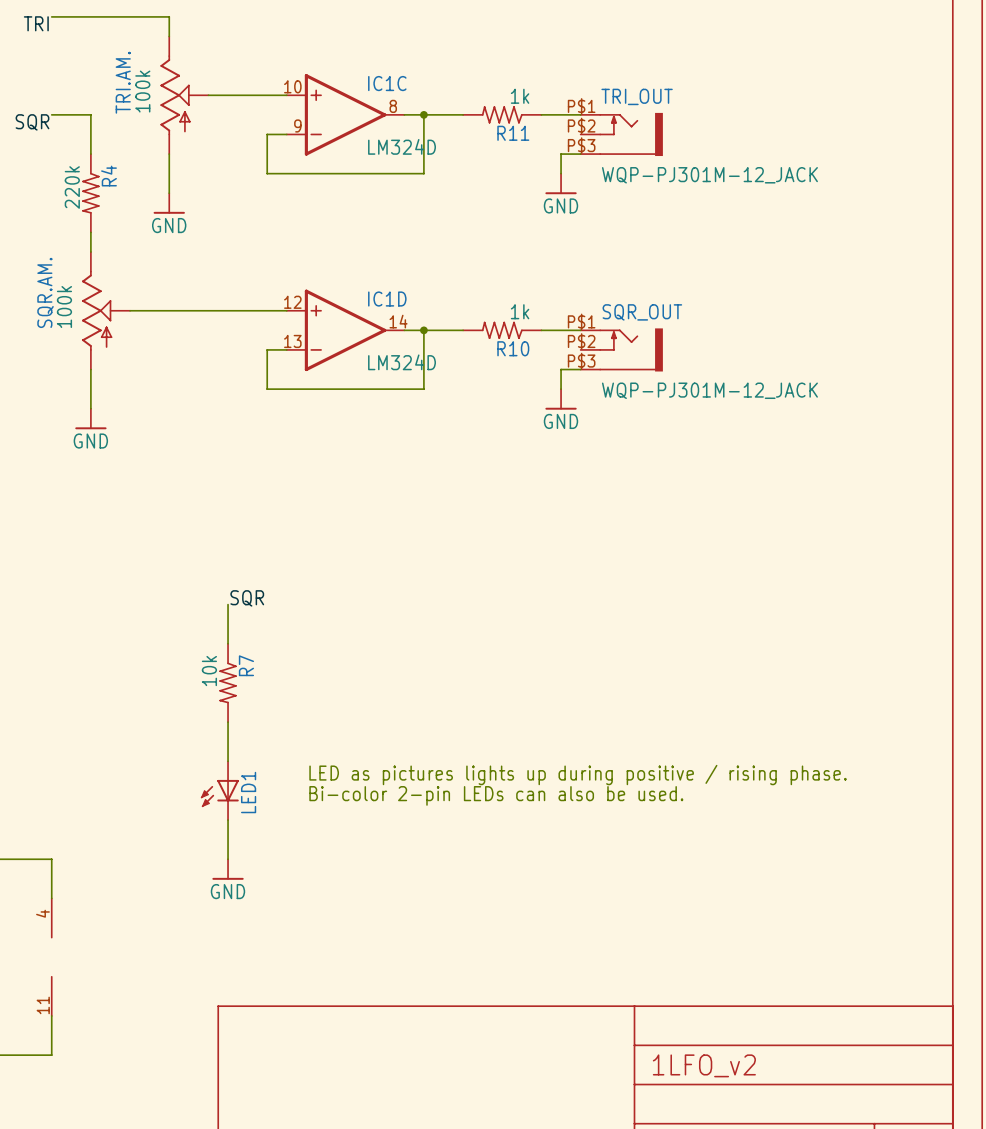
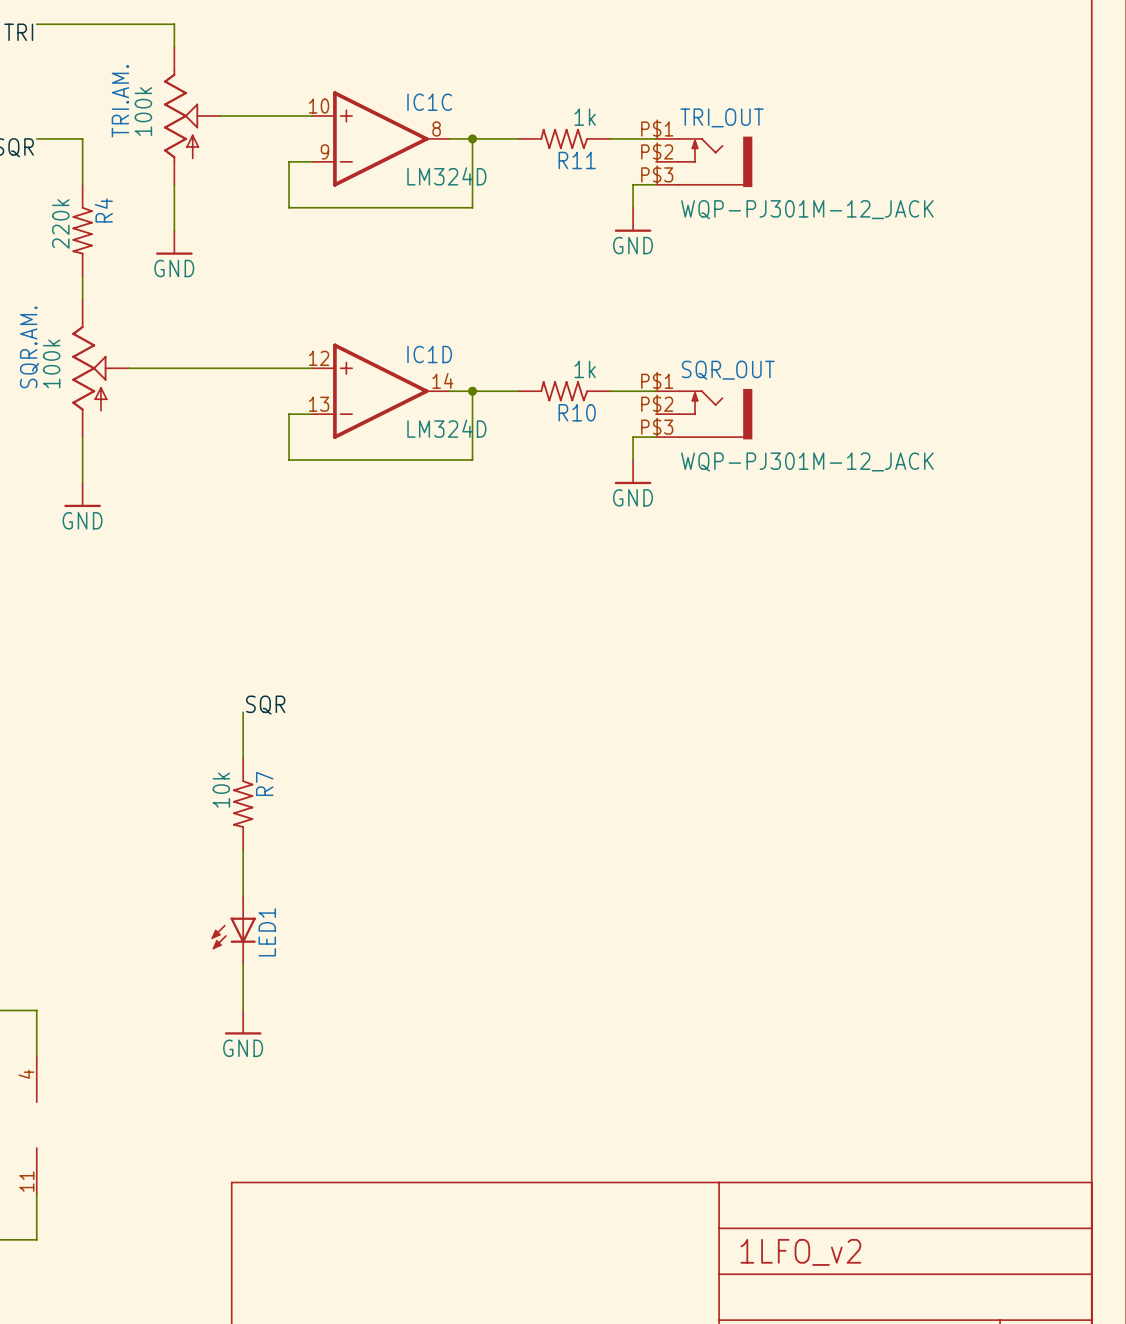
text: LED as pictures lights up during positive / rising phase. (578, 775) -> none
text: Bi-color 2-pin LEDs can also be used. (496, 795) -> none

